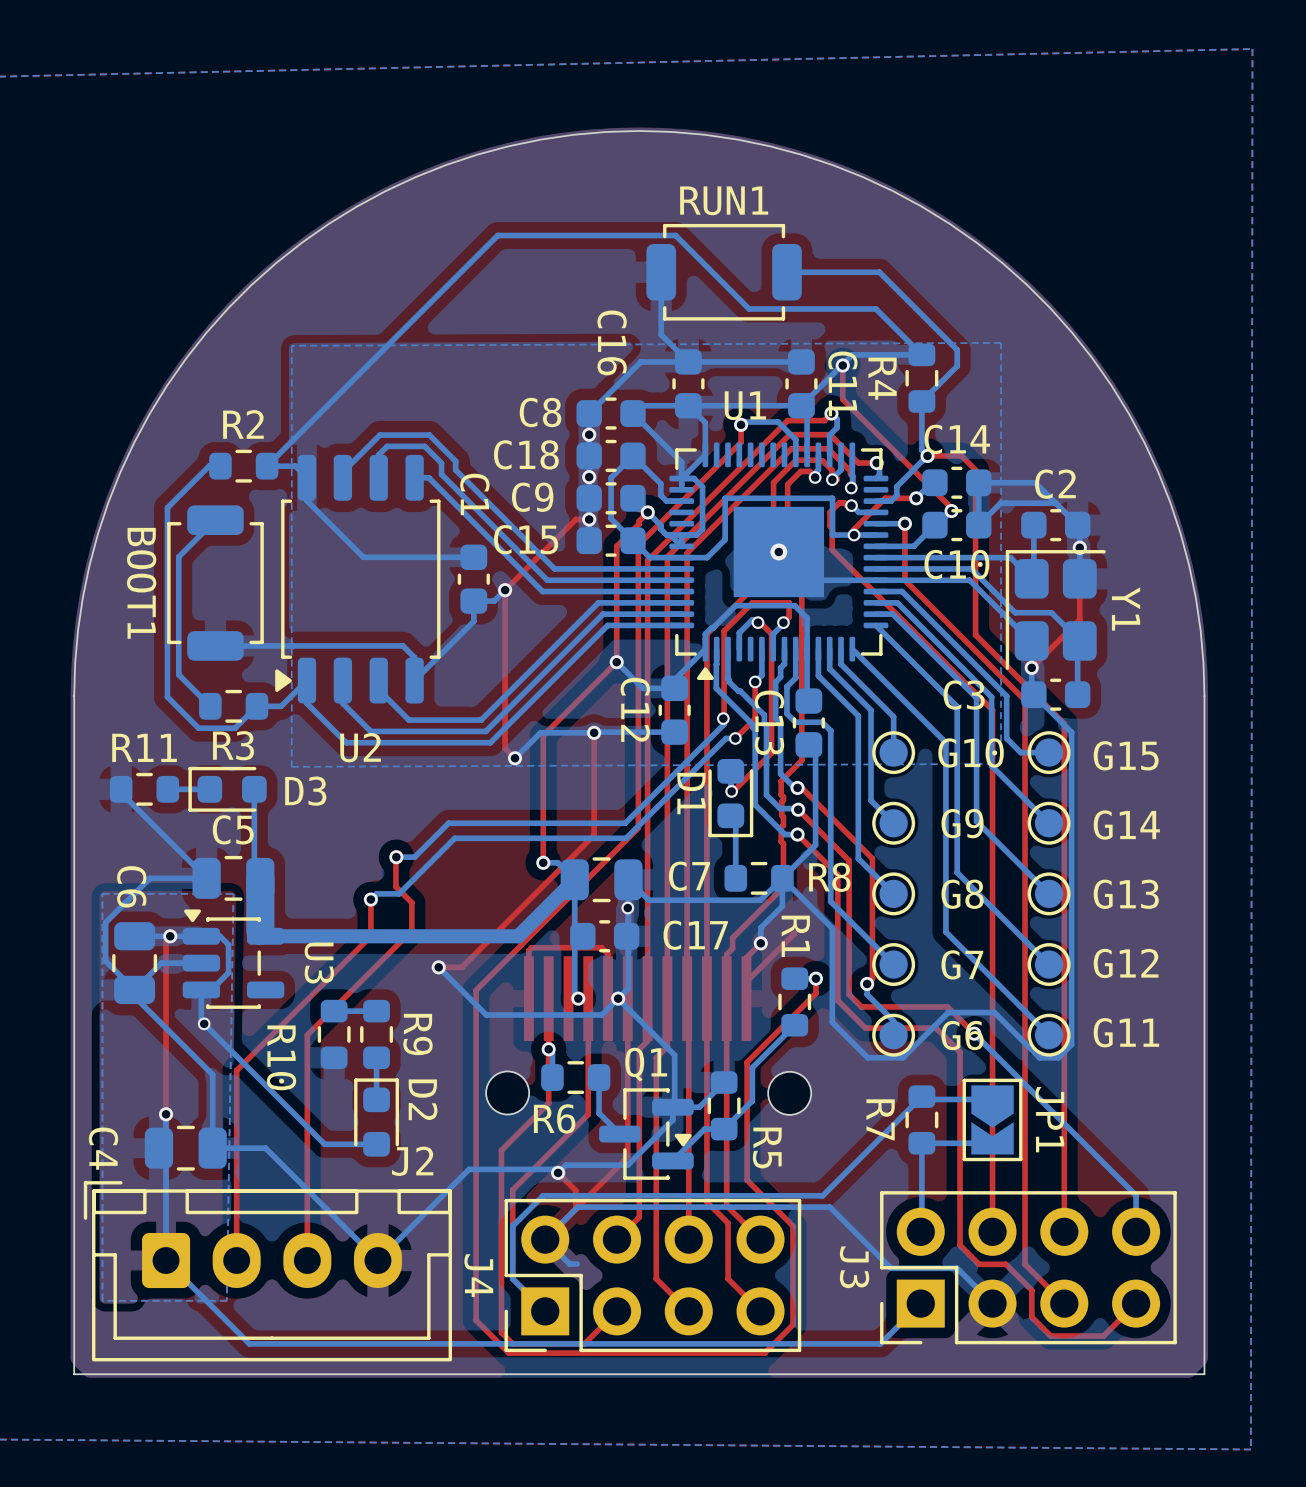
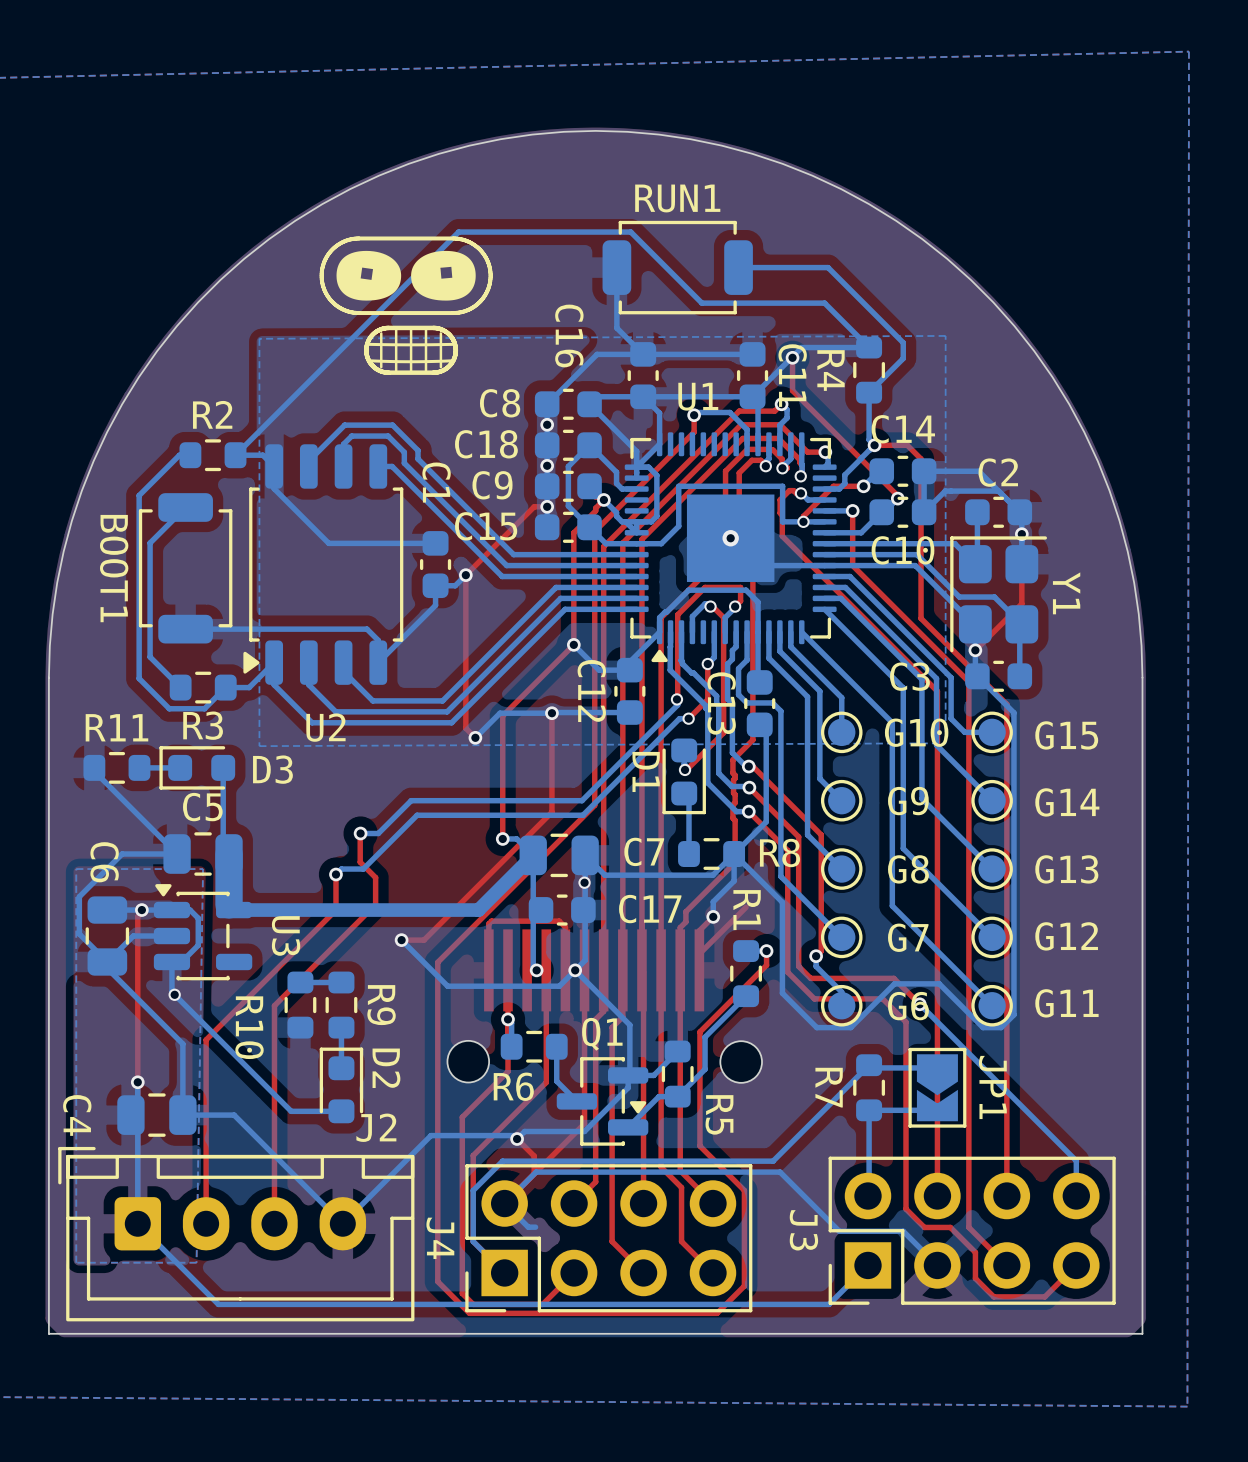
line: none -> (453, 238) (356, 238) (344, 241) (332, 249) (324, 261) (321, 275) (324, 290) (336, 305) (353, 312) (453, 313) (467, 310) (478, 303) (486, 293) (490, 281) (489, 268) (485, 256) (477, 246) (466, 240) (453, 238)
drawing: none -> [336, 250, 476, 301]
line: none -> (435, 328) (387, 327) (379, 330) (372, 335) (367, 342) (366, 351) (368, 360) (375, 368) (385, 372) (434, 372) (443, 370) (453, 360) (455, 346) (448, 333) (435, 328)
line: none -> (411, 328) (411, 371)
line: none -> (396, 329) (396, 370)
line: none -> (425, 329) (425, 370)
line: none -> (381, 333) (381, 367)
line: none -> (440, 333) (440, 367)
line: none -> (453, 344) (368, 344)
line: none -> (453, 360) (368, 360)

